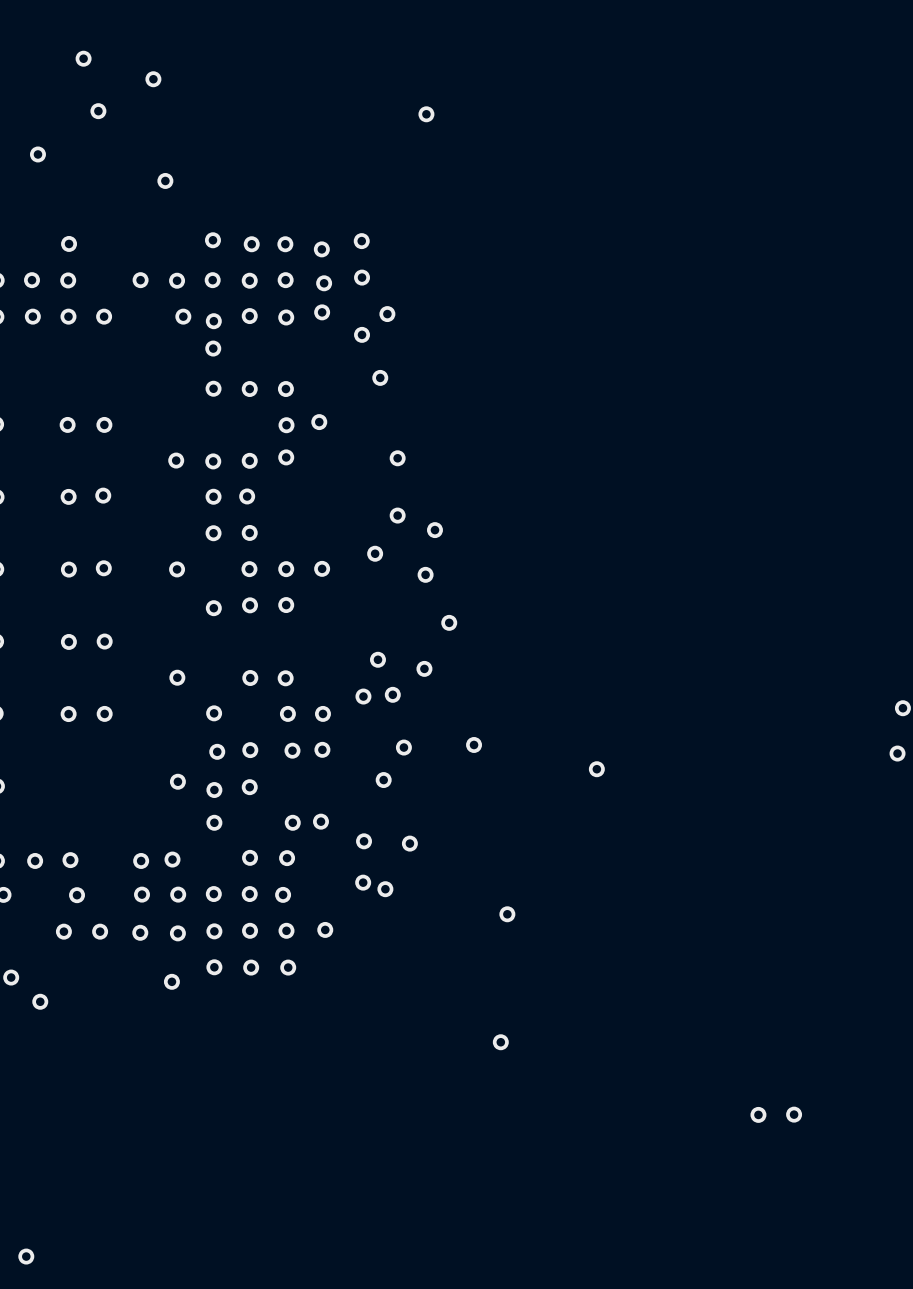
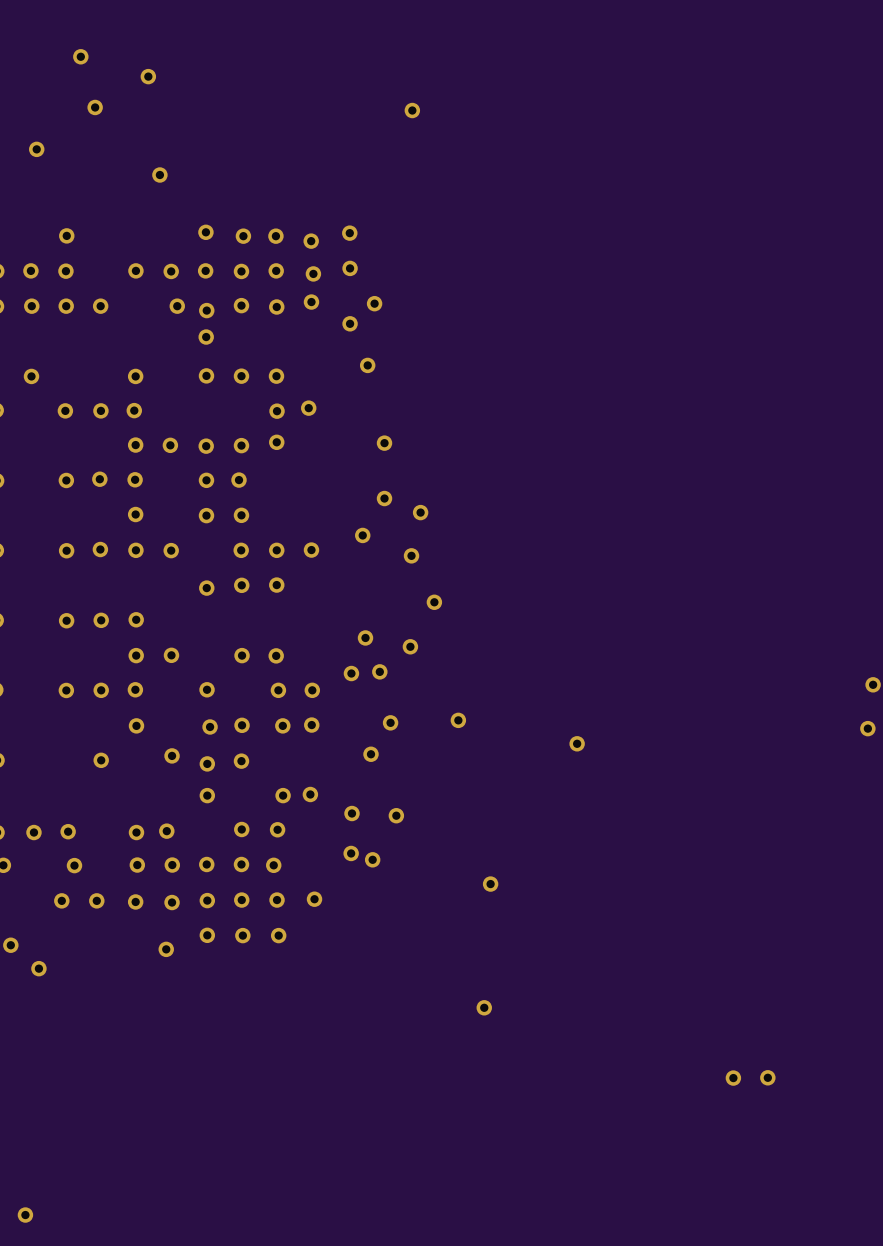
via: none -> (31, 376)
via: none -> (135, 376)
via: none -> (134, 410)
via: none -> (135, 445)
via: none -> (135, 479)
via: none -> (135, 514)
via: none -> (135, 550)
via: none -> (136, 619)
via: none -> (136, 655)
via: none -> (135, 689)
via: none -> (136, 725)
via: none -> (101, 760)

